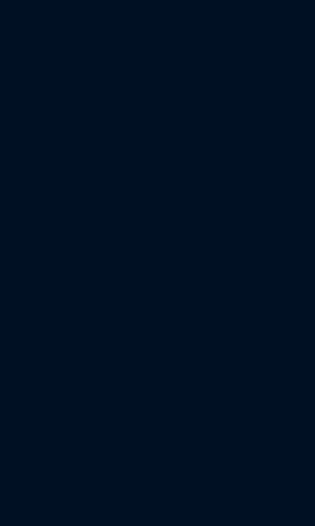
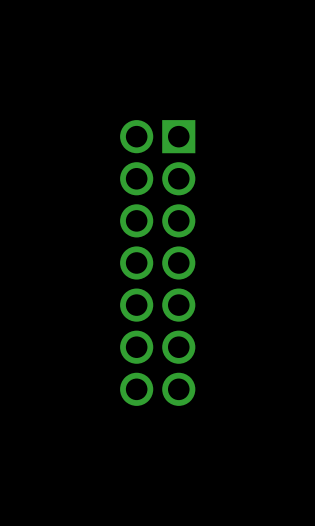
part: none -> (157, 262)

